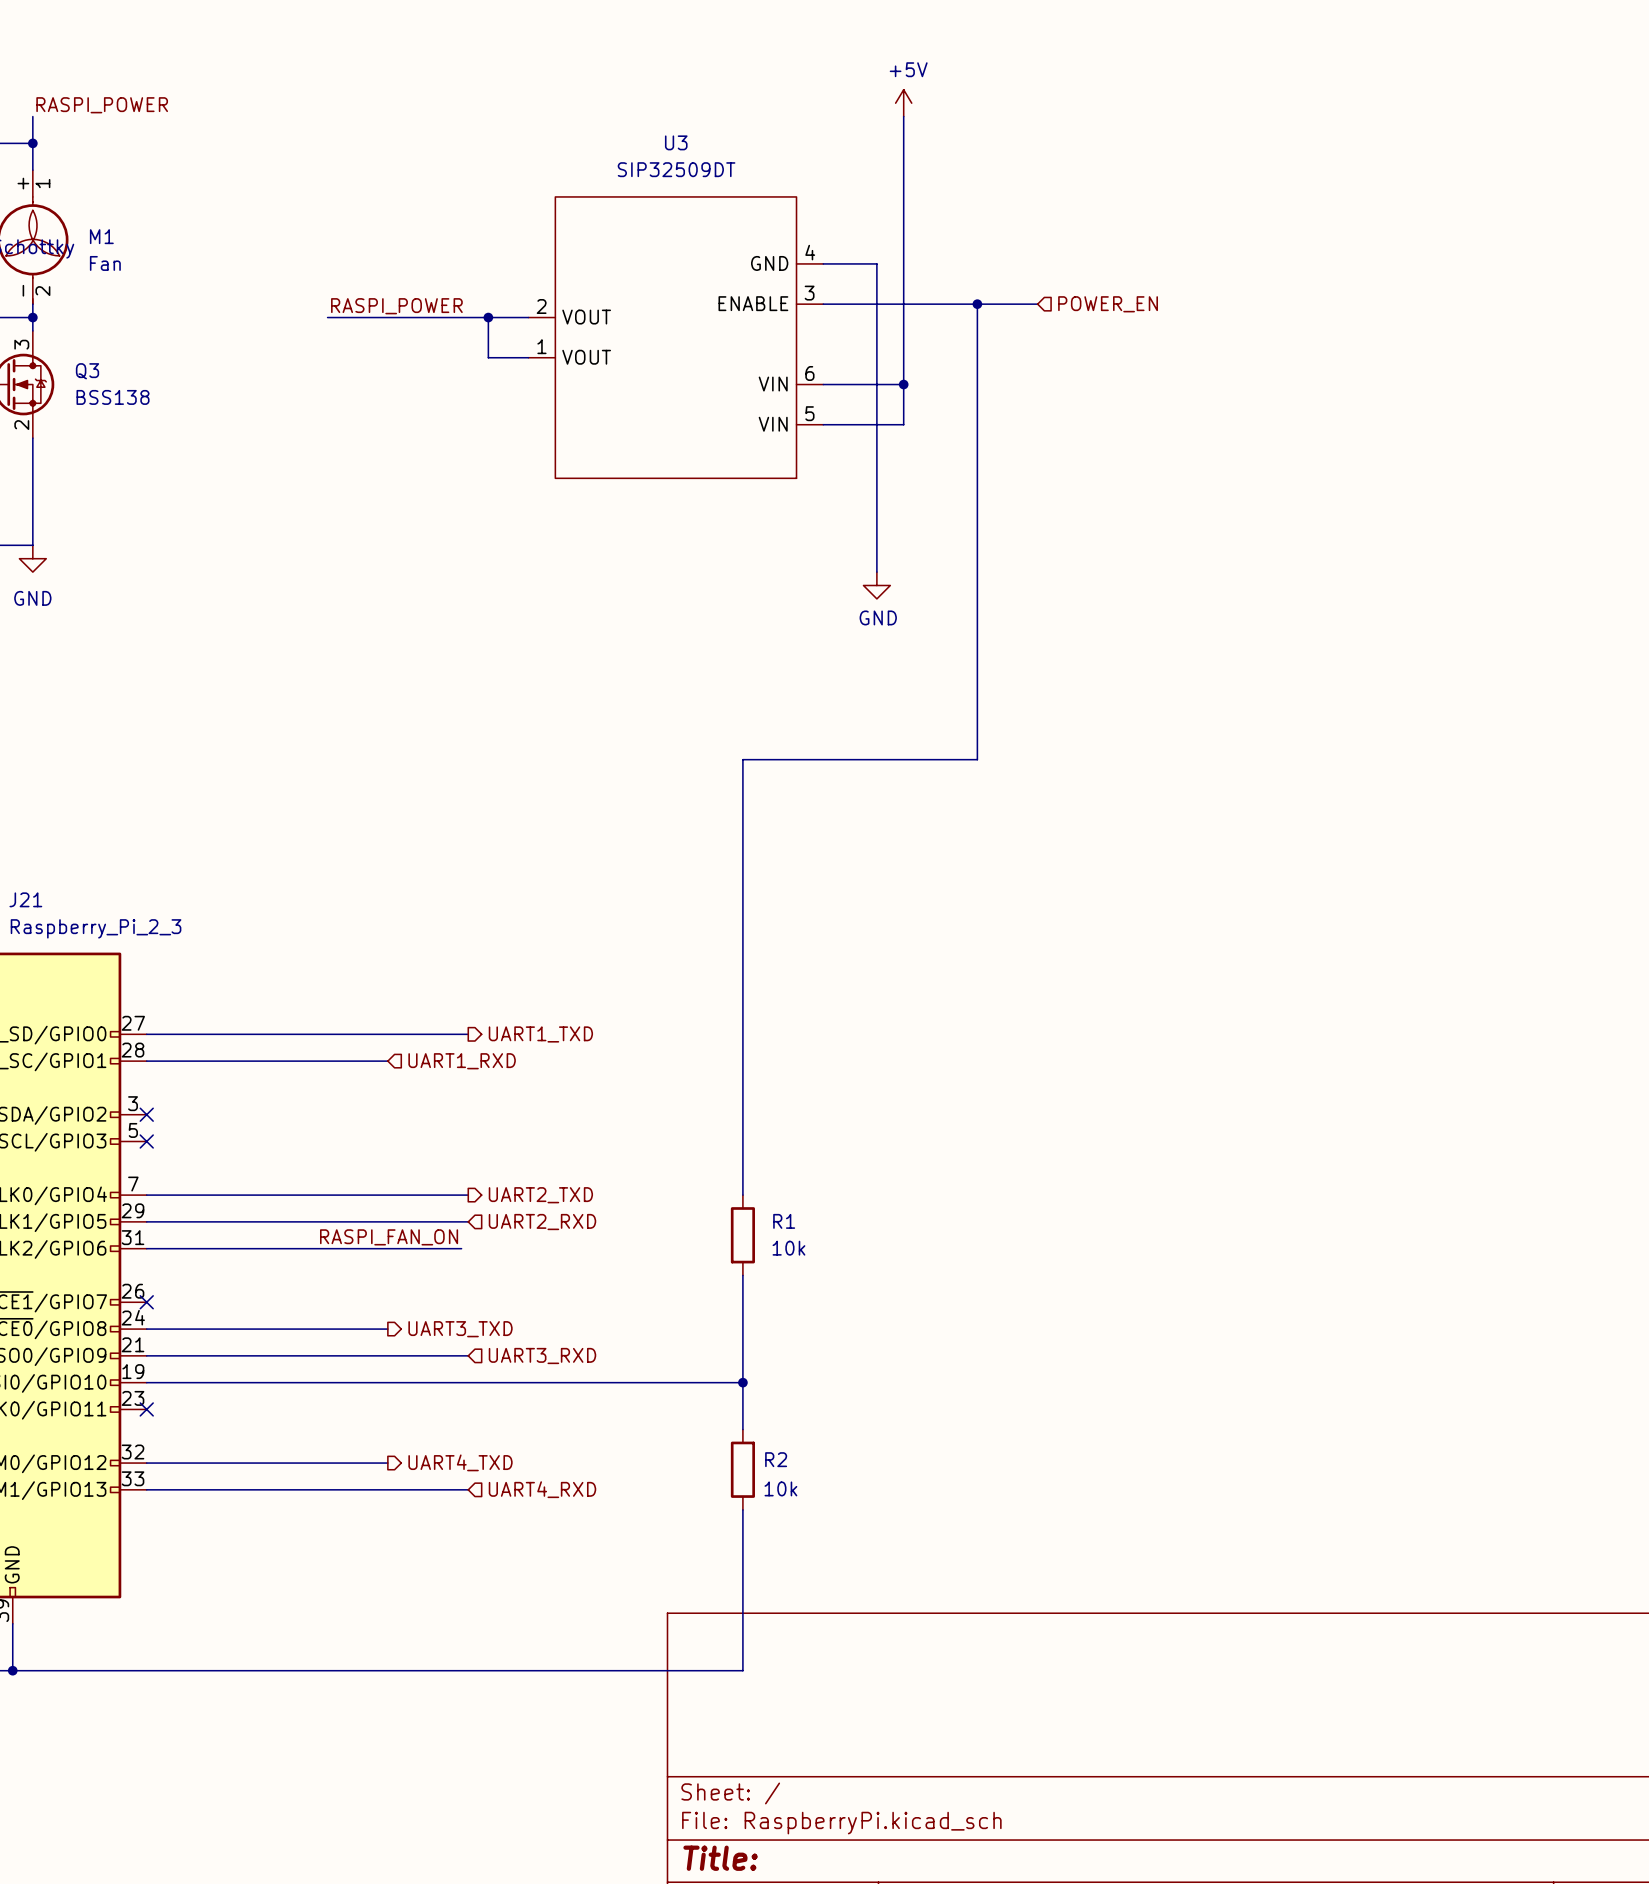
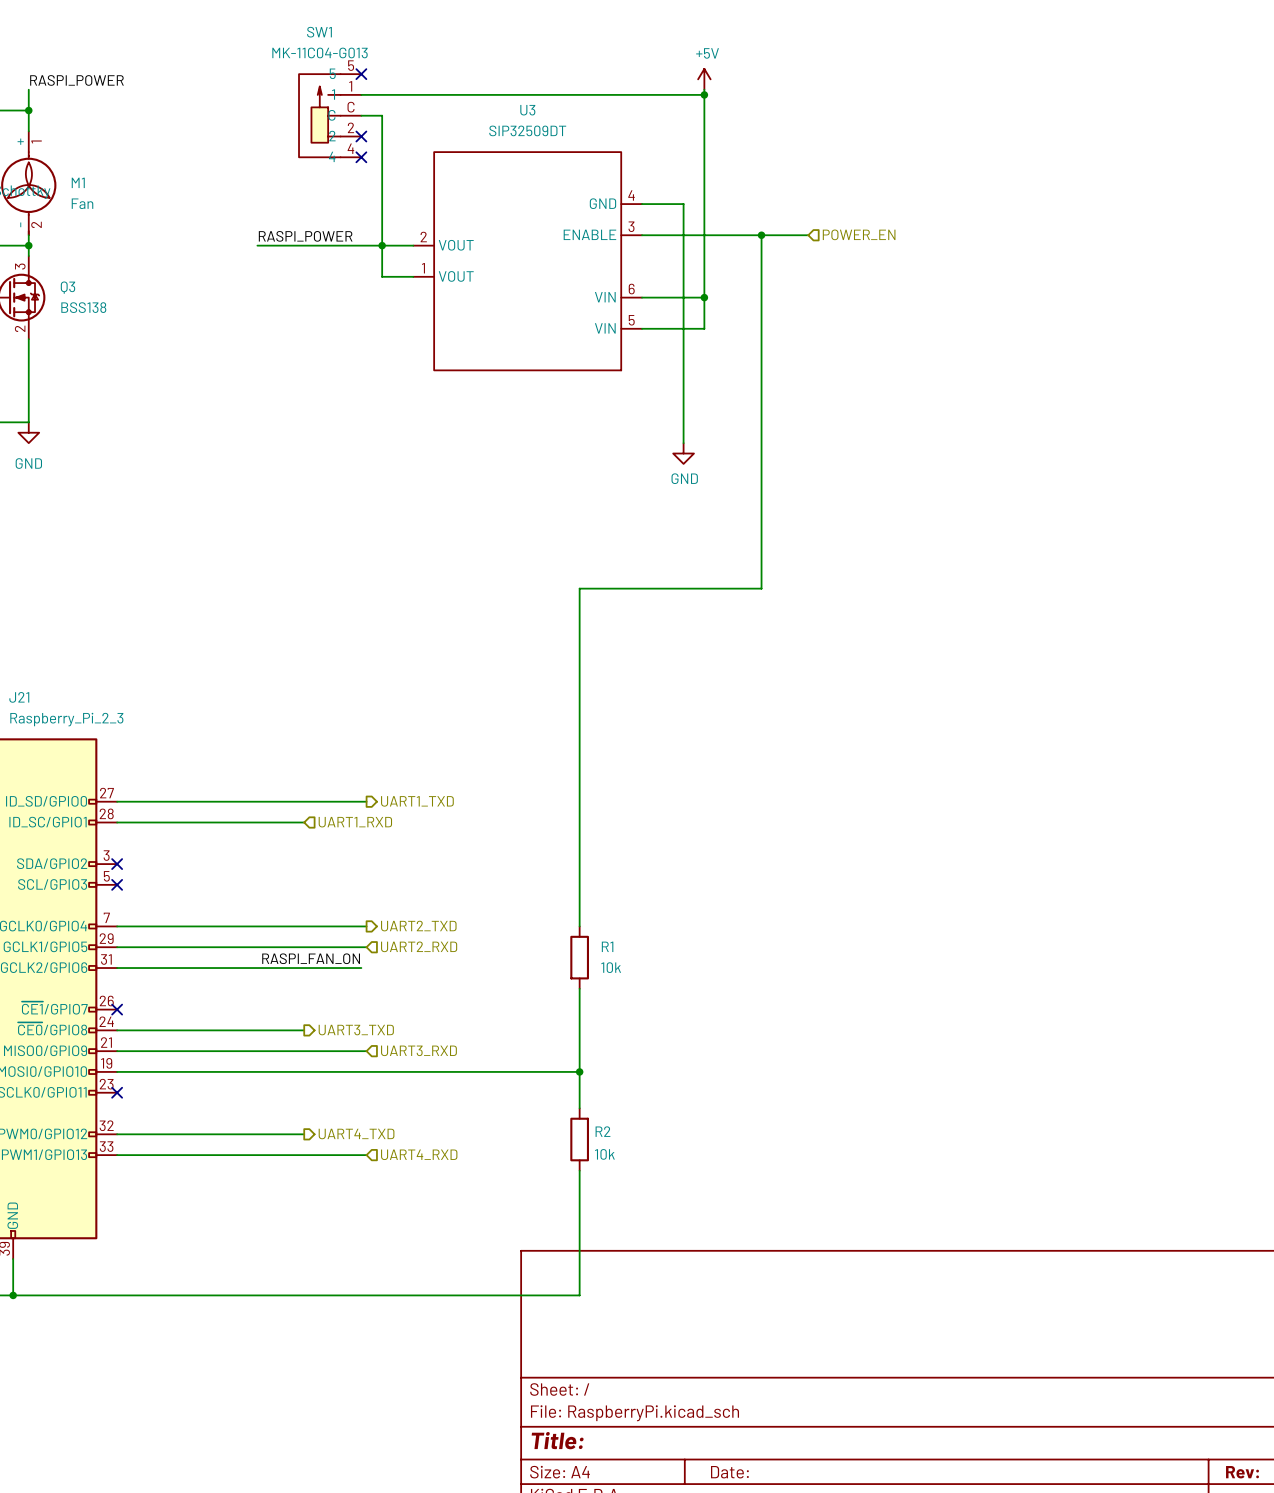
no-connect mark: none -> (361, 74)
wire: none -> (361, 94) (704, 94)
junction: none -> (704, 94)
SW1: none -> MK-11C04-G013 (330, 115)
wire: none -> (361, 115) (382, 115) (382, 245)
no-connect mark: none -> (361, 136)
no-connect mark: none -> (361, 157)

